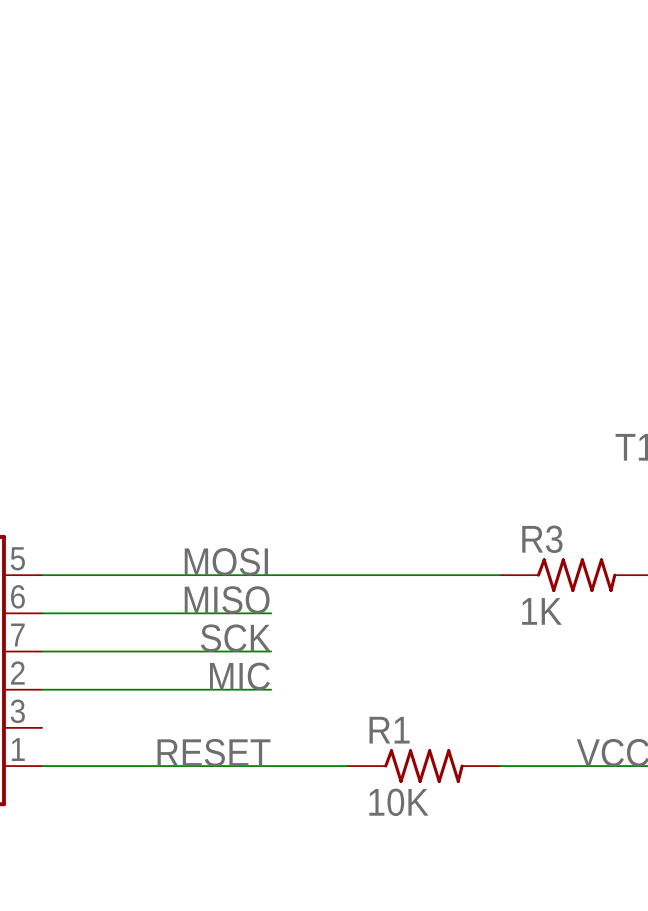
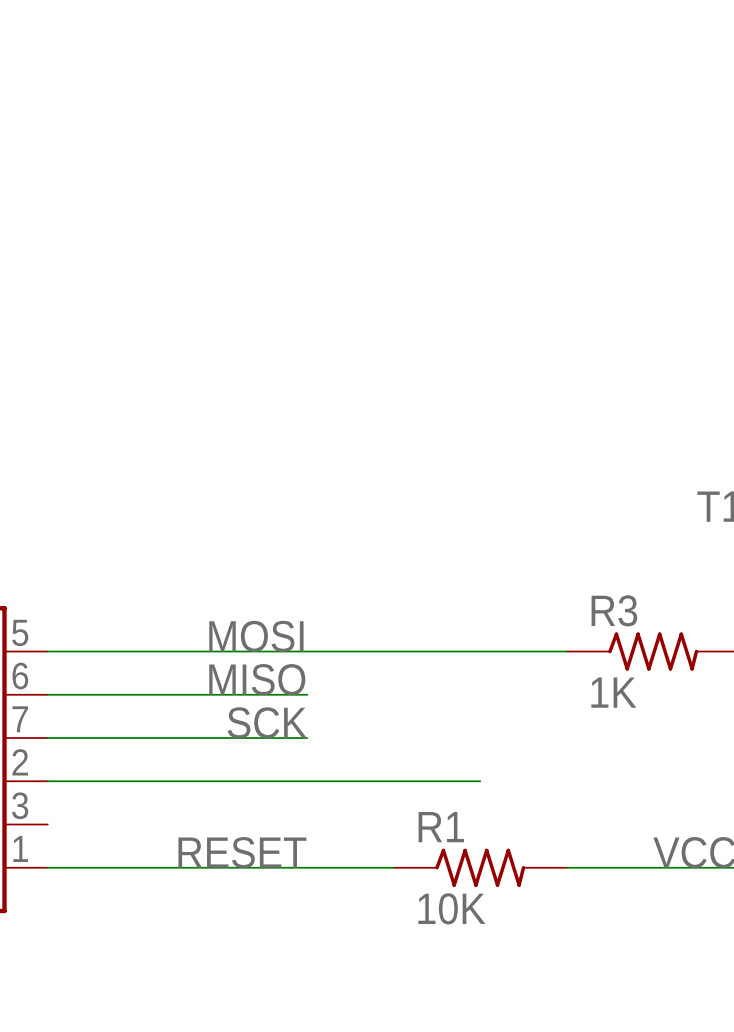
label: MIC (239, 676) -> none
wire: none -> (307, 781) (480, 781)

